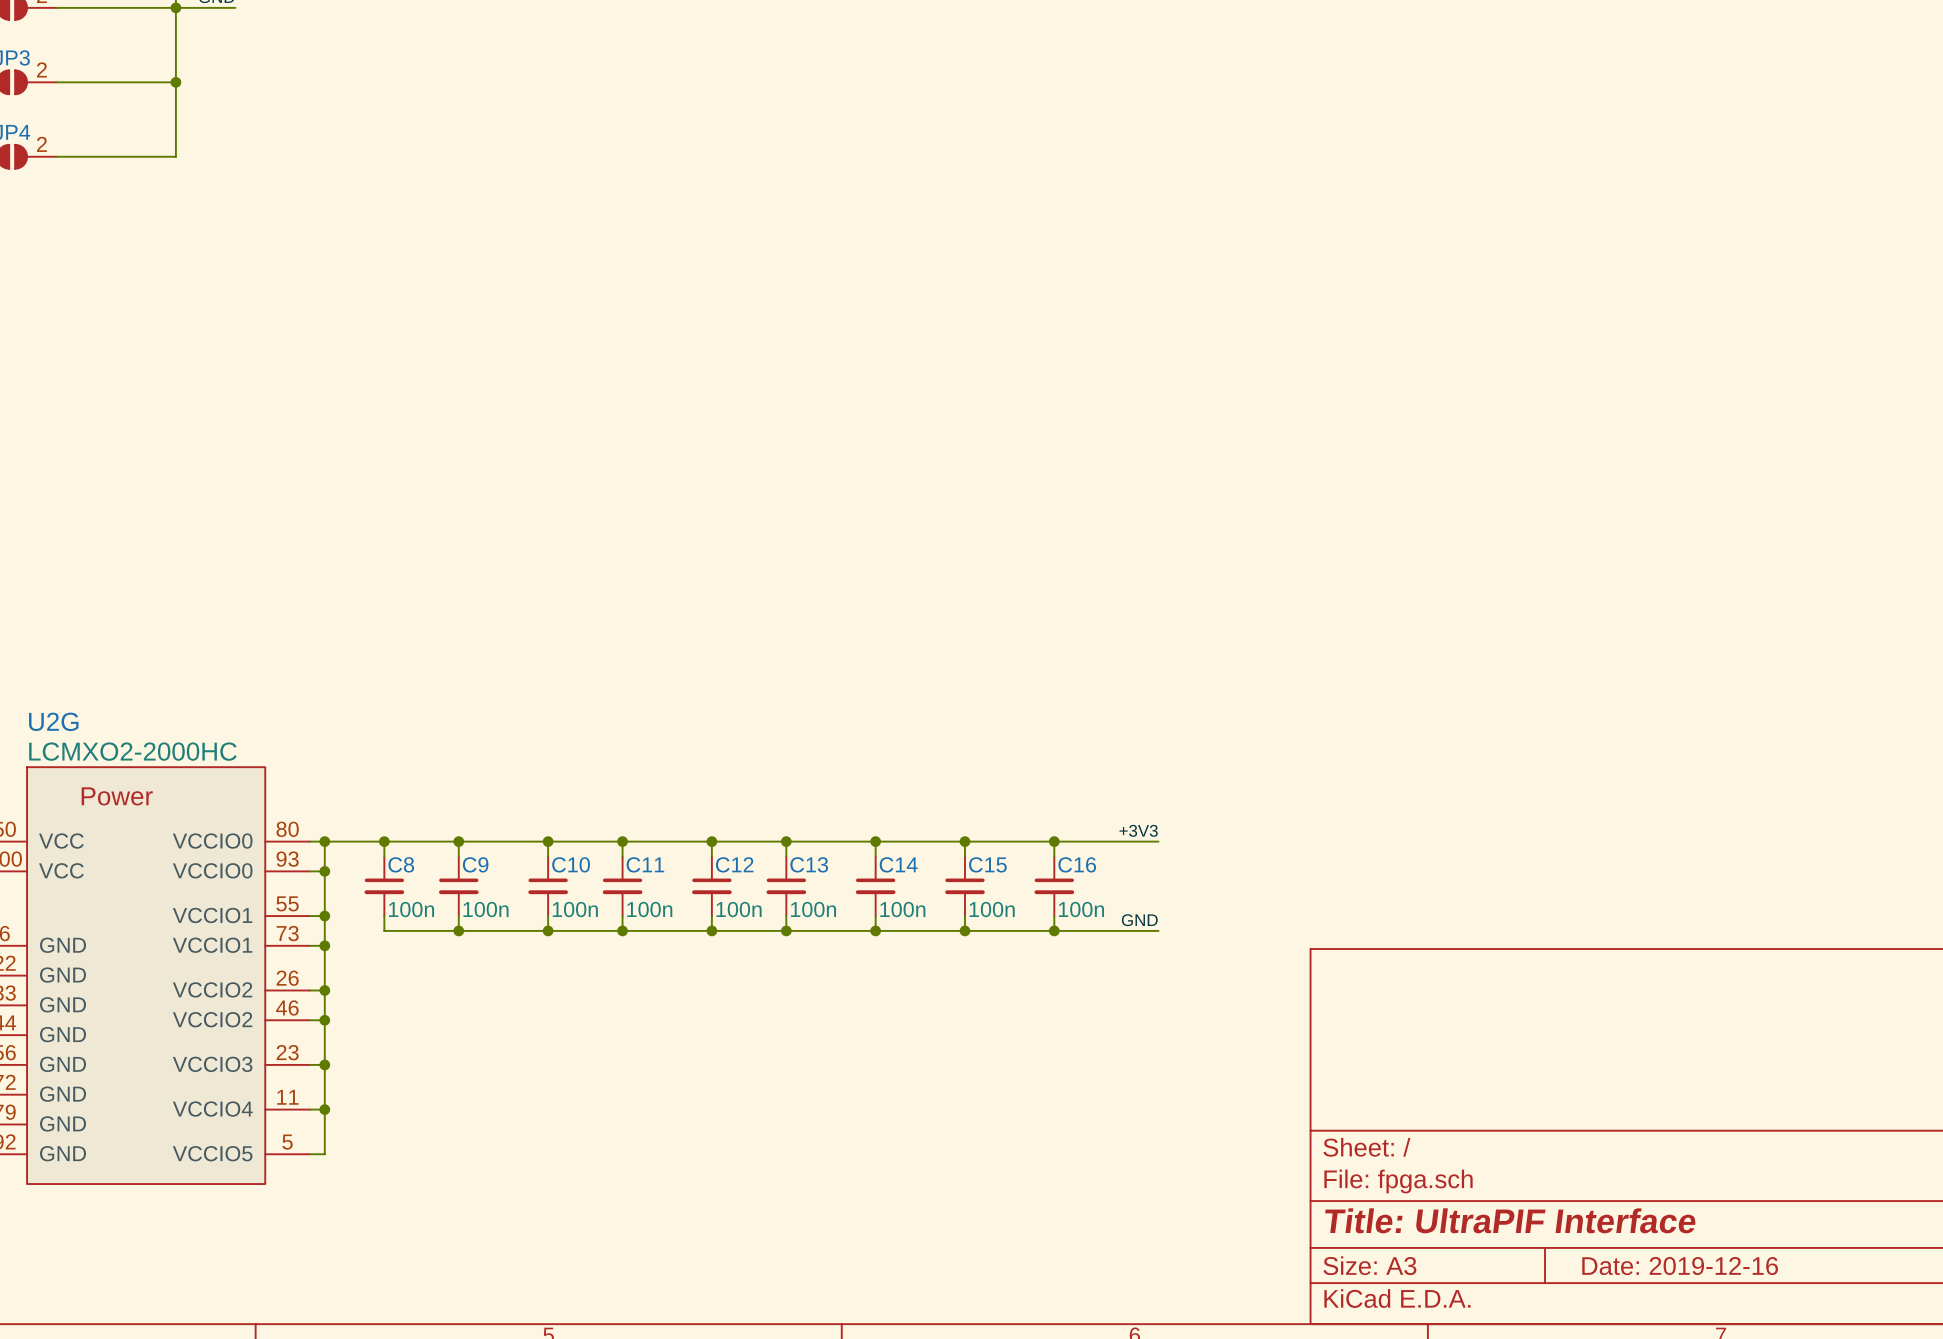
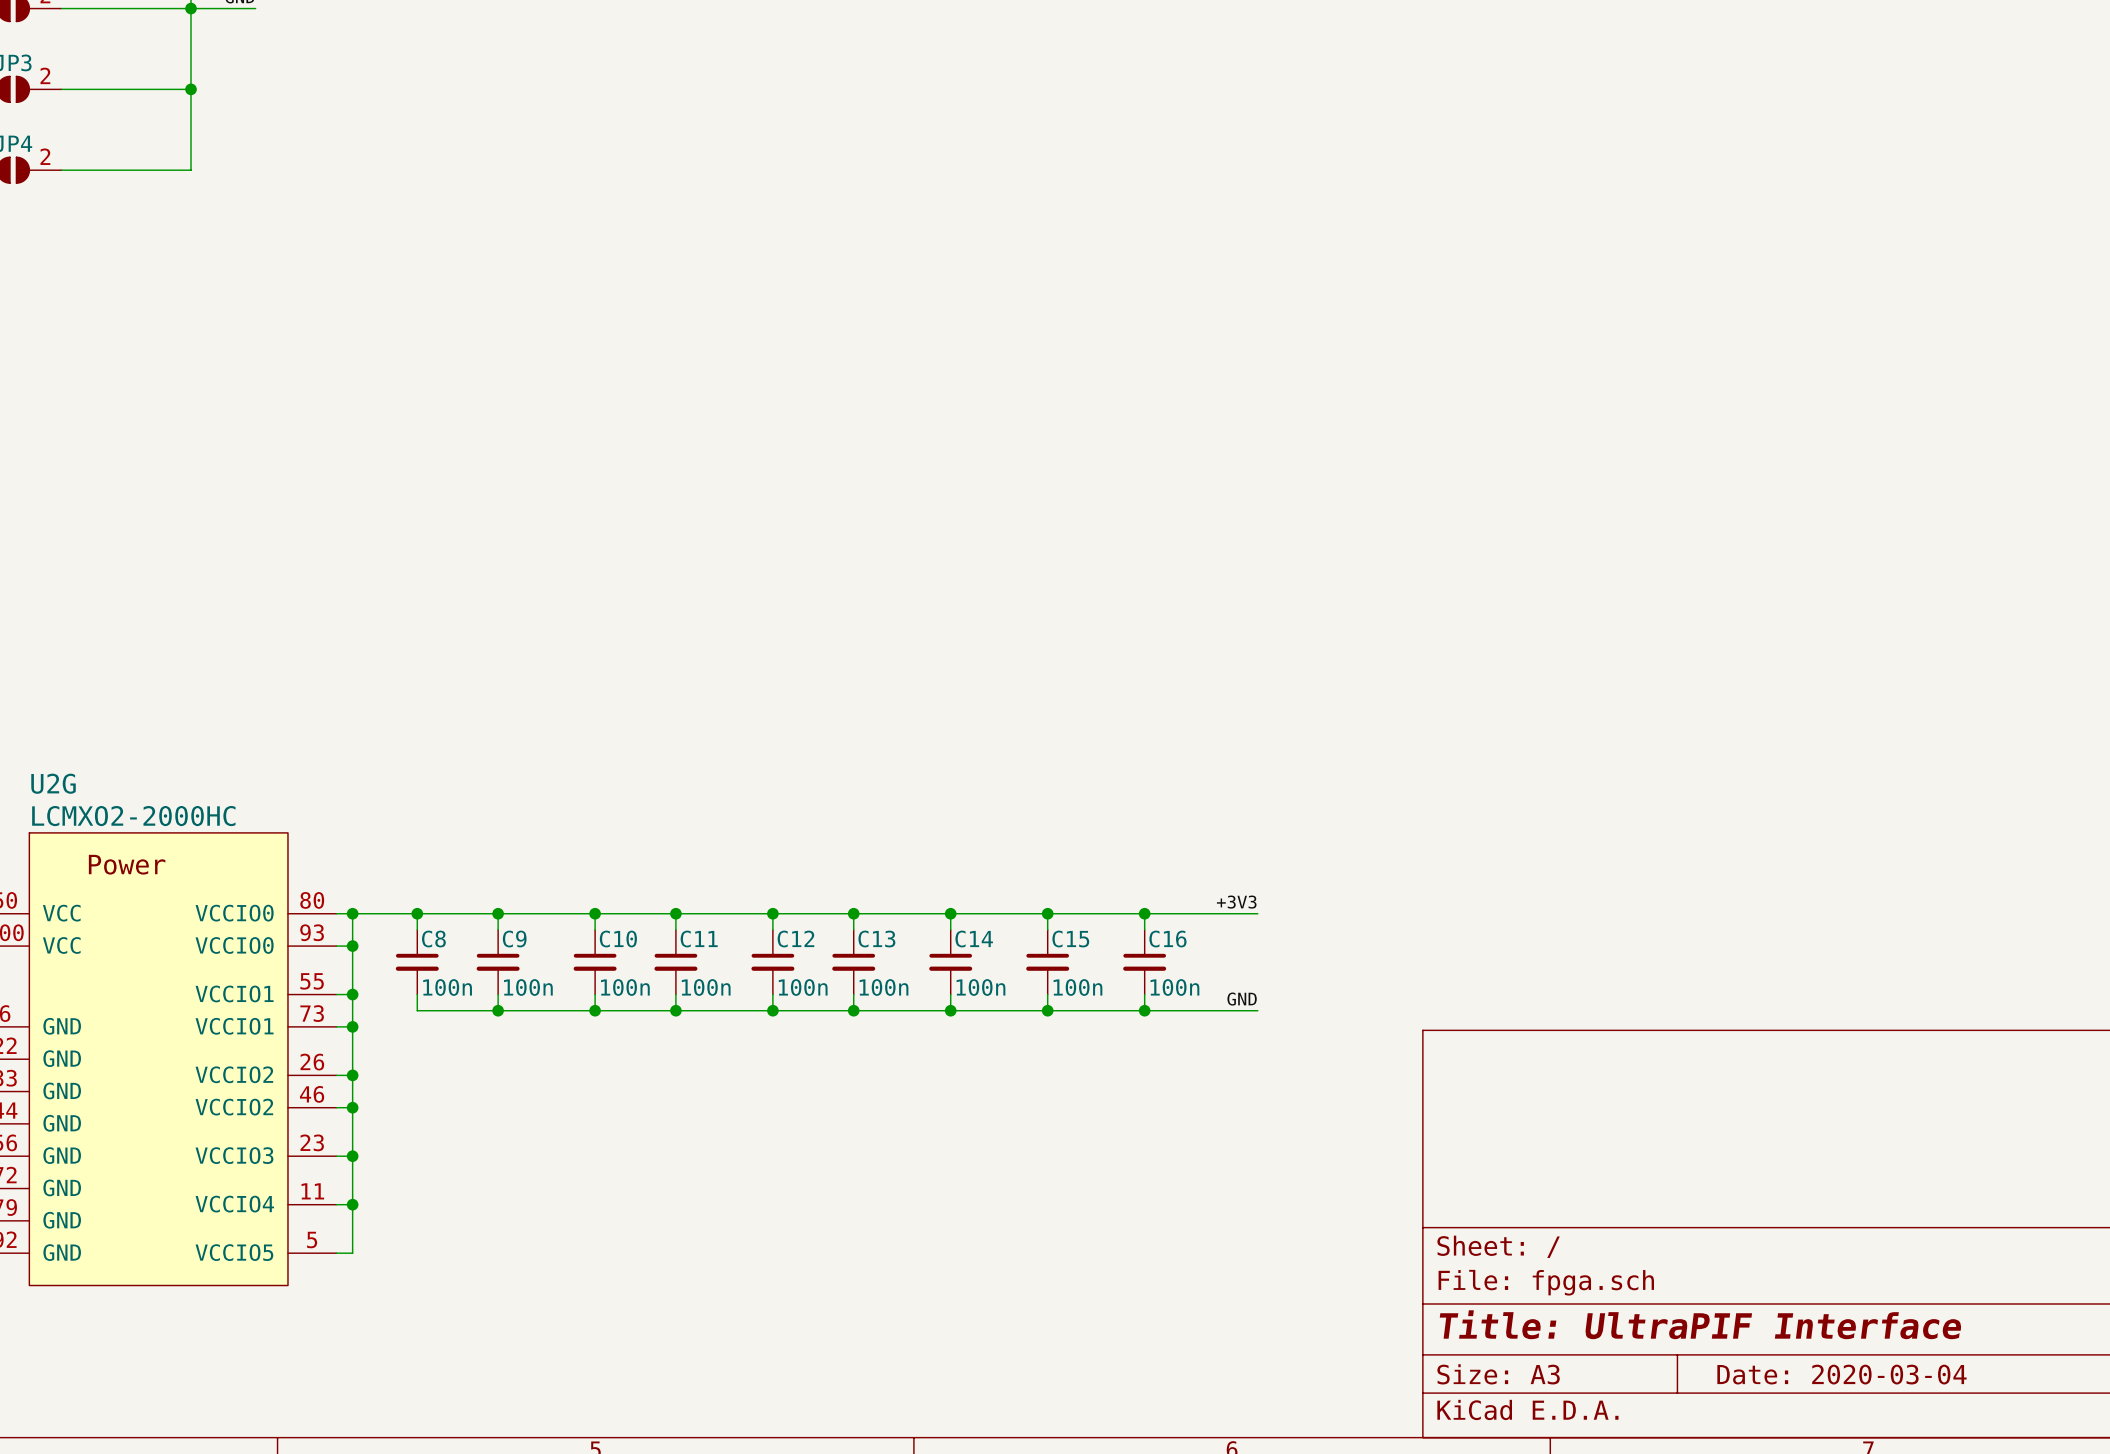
title block: Date: 2019-12-16 (1680, 1266) -> Date: 2020-03-04 (1841, 1374)

